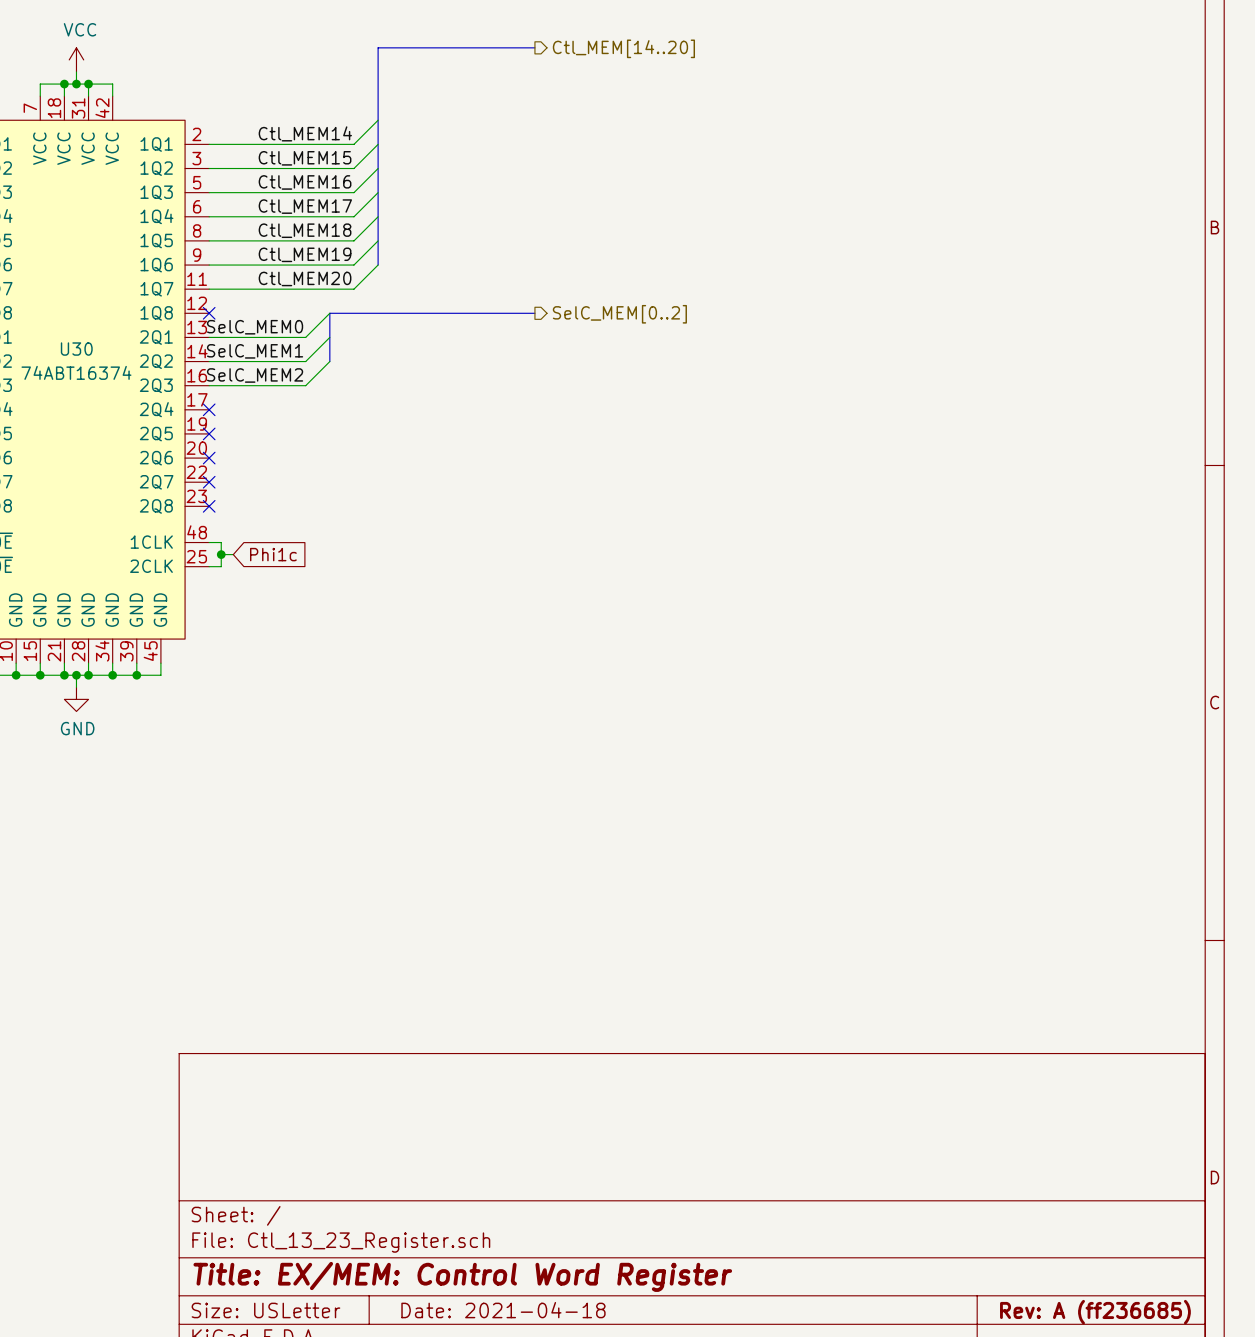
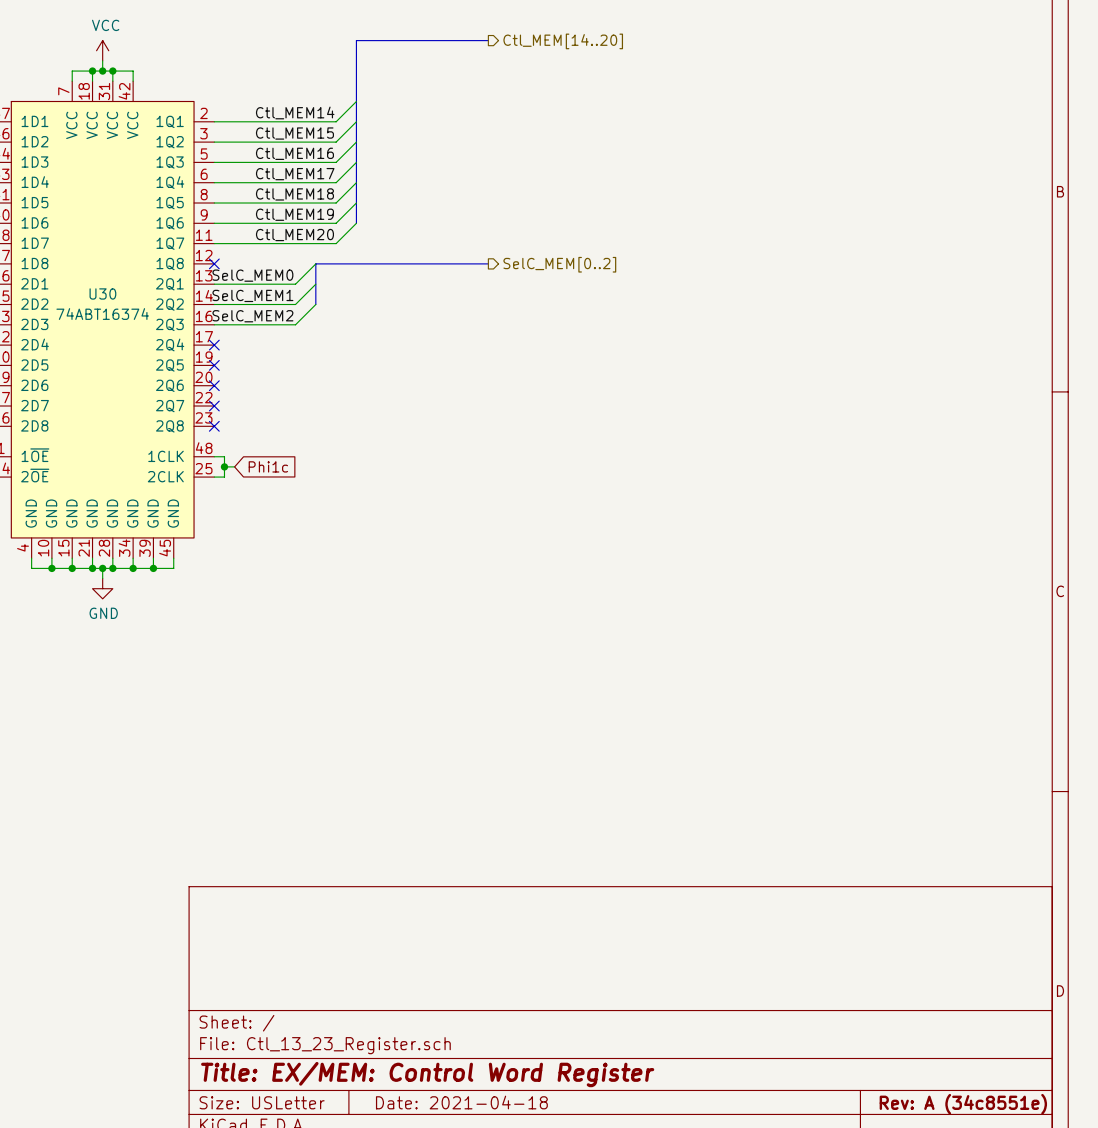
title block: Rev: A (ff236685) (1095, 1312) -> Rev: A (34c8551e) (963, 1104)

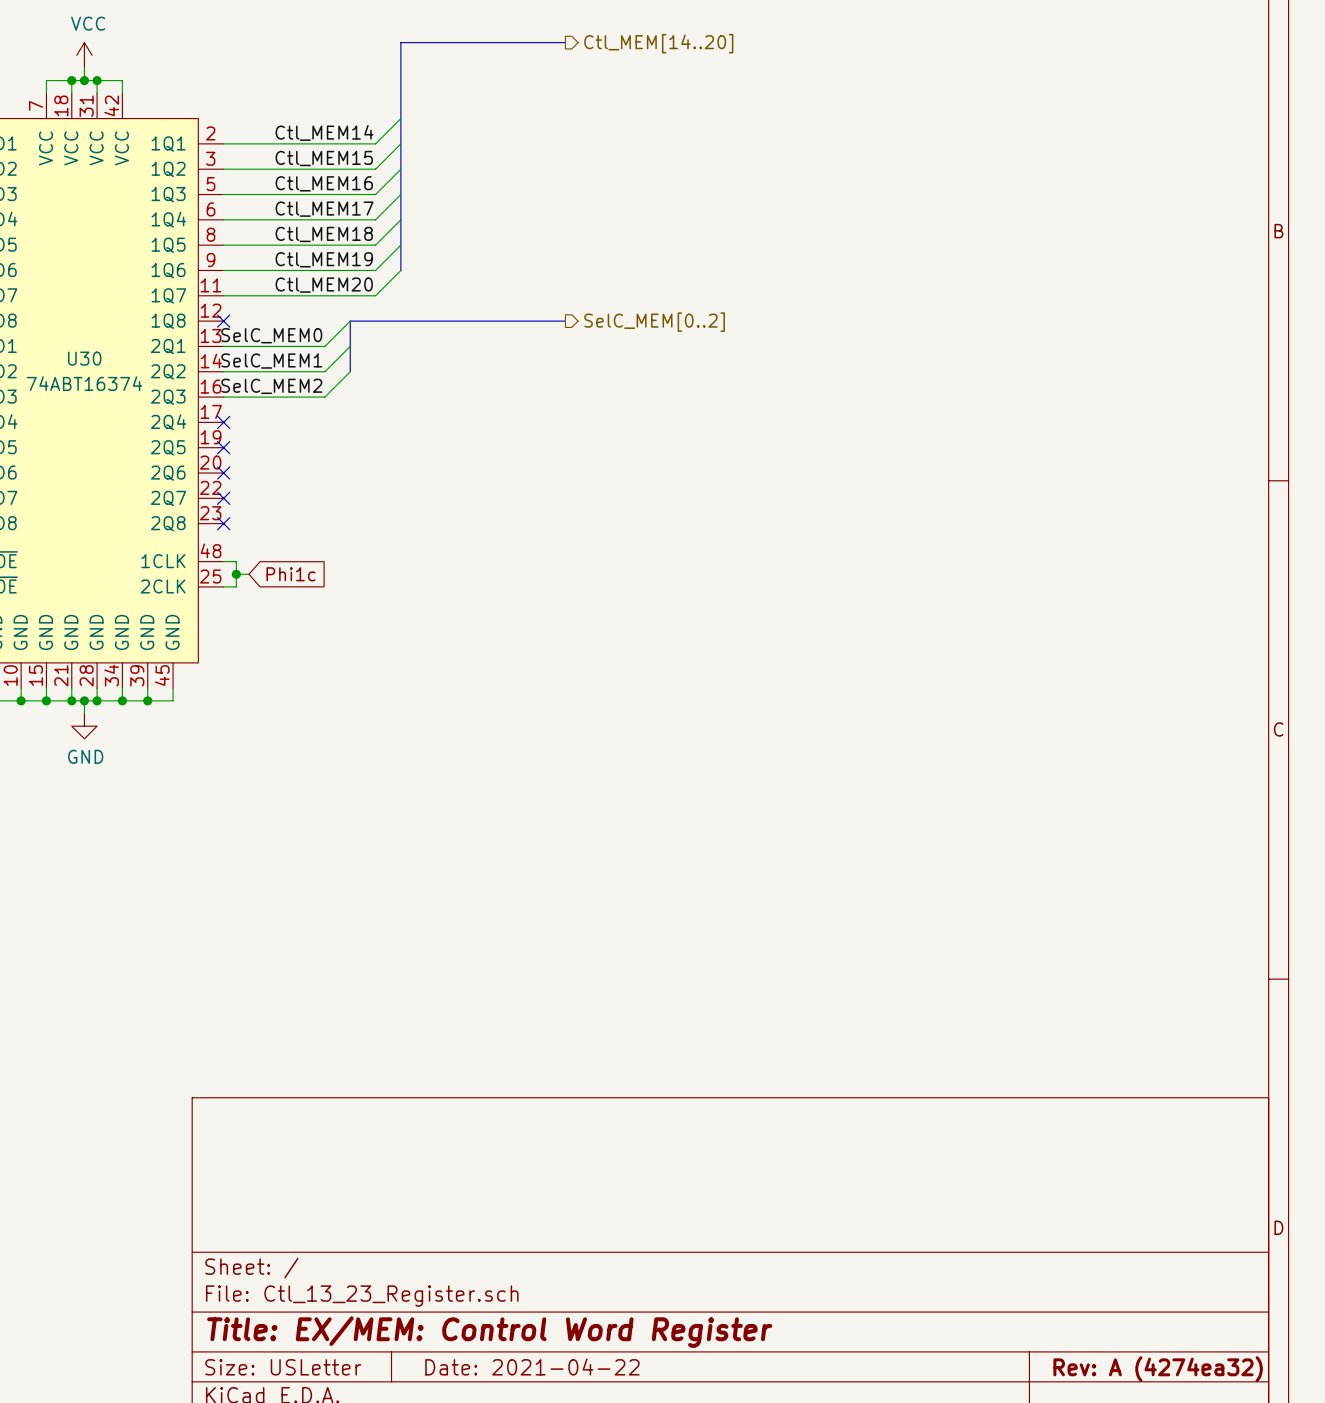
title block: Date: 2021-04-18 (461, 1102) -> Date: 2021-04-22 (532, 1366)
title block: Rev: A (34c8551e) (963, 1104) -> Rev: A (4274ea32) (1158, 1369)

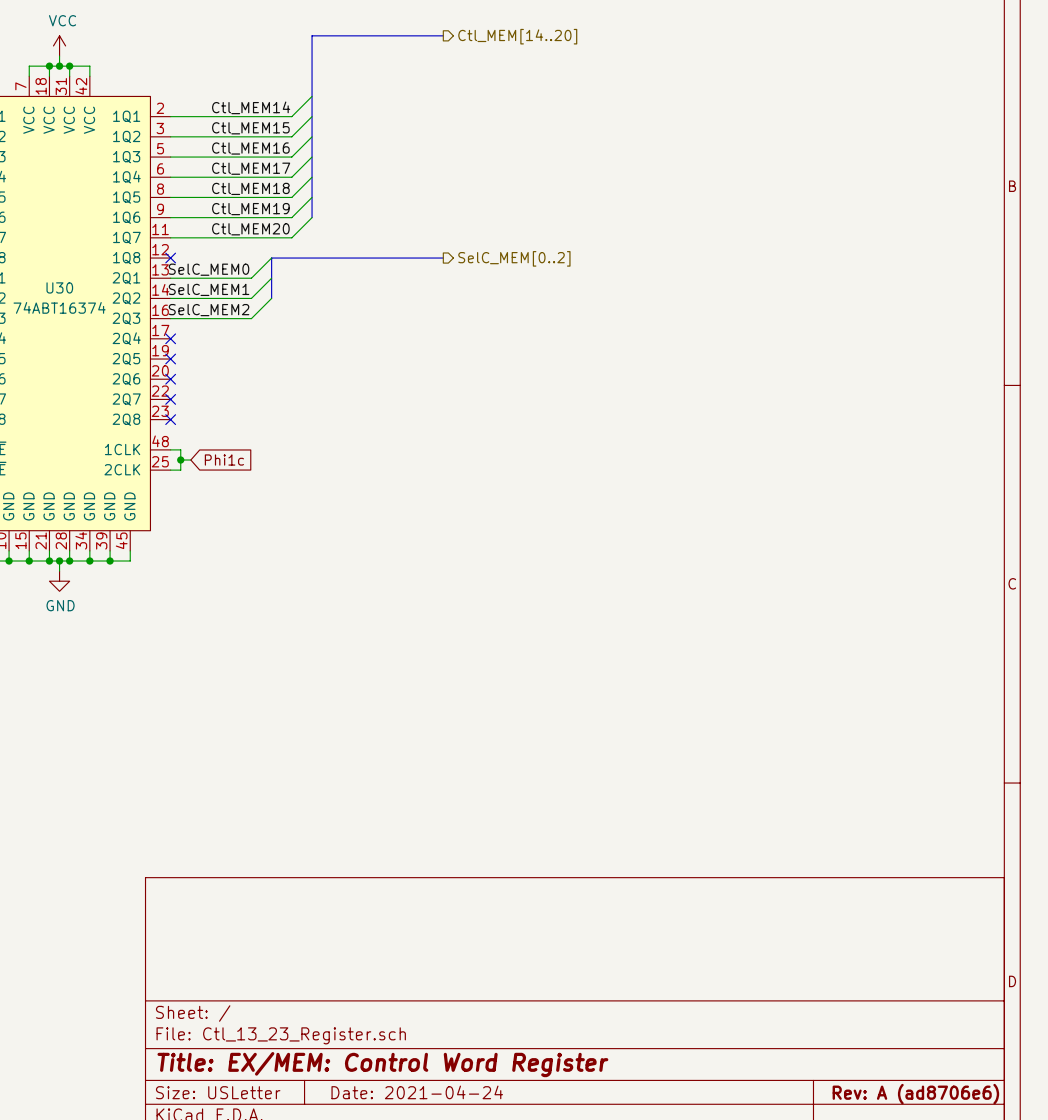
title block: Date: 2021-04-22 (532, 1366) -> Date: 2021-04-24 (417, 1092)
title block: Rev: A (4274ea32) (1158, 1369) -> Rev: A (ad8706e6) (915, 1094)

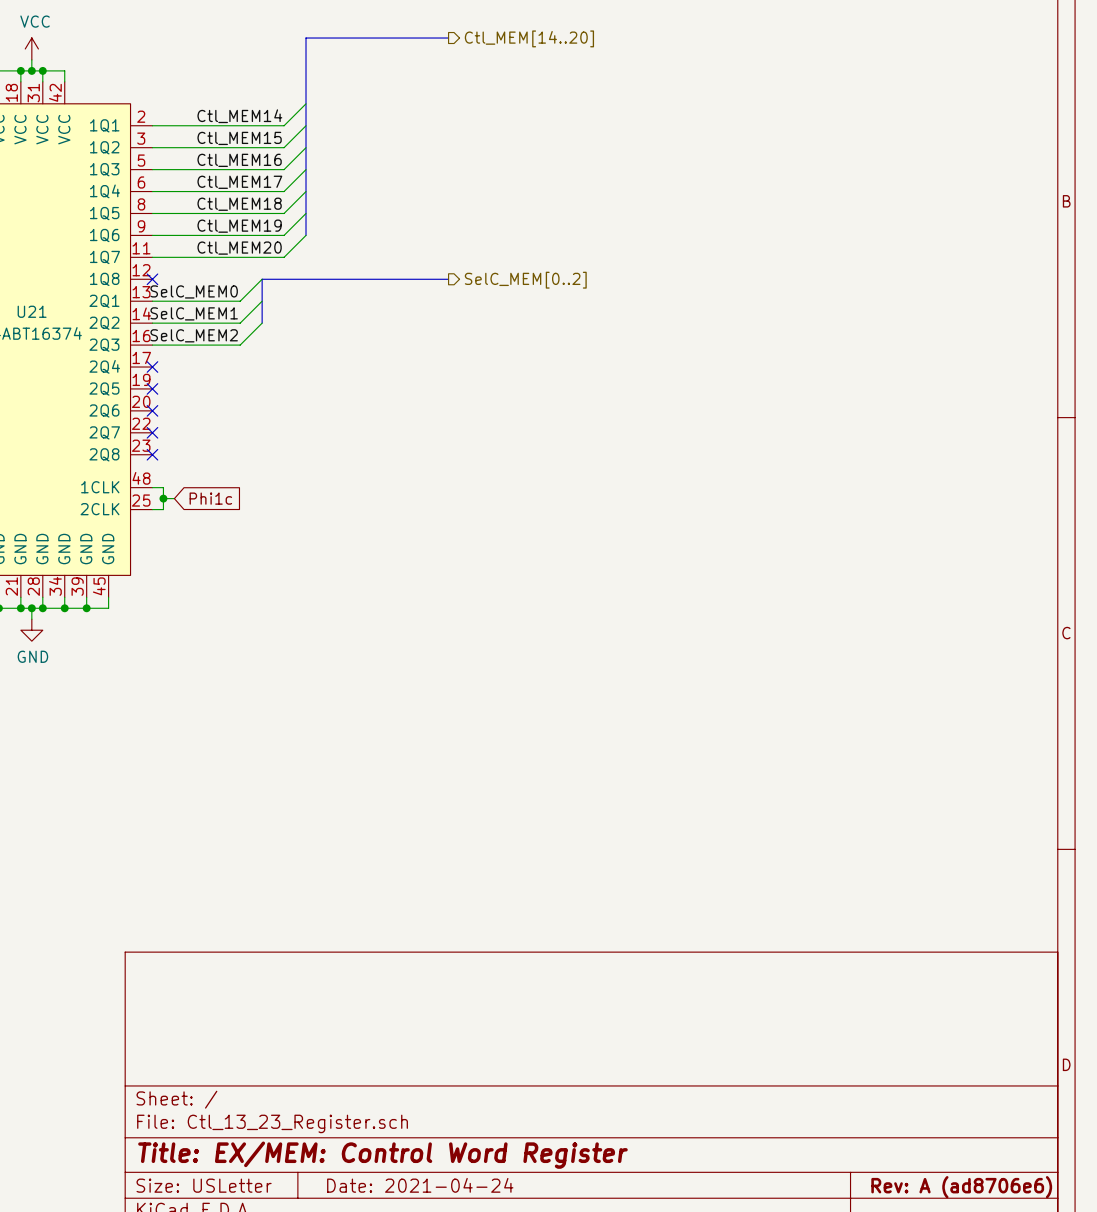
U30 name: U30 (59, 287) -> U21 (32, 311)

